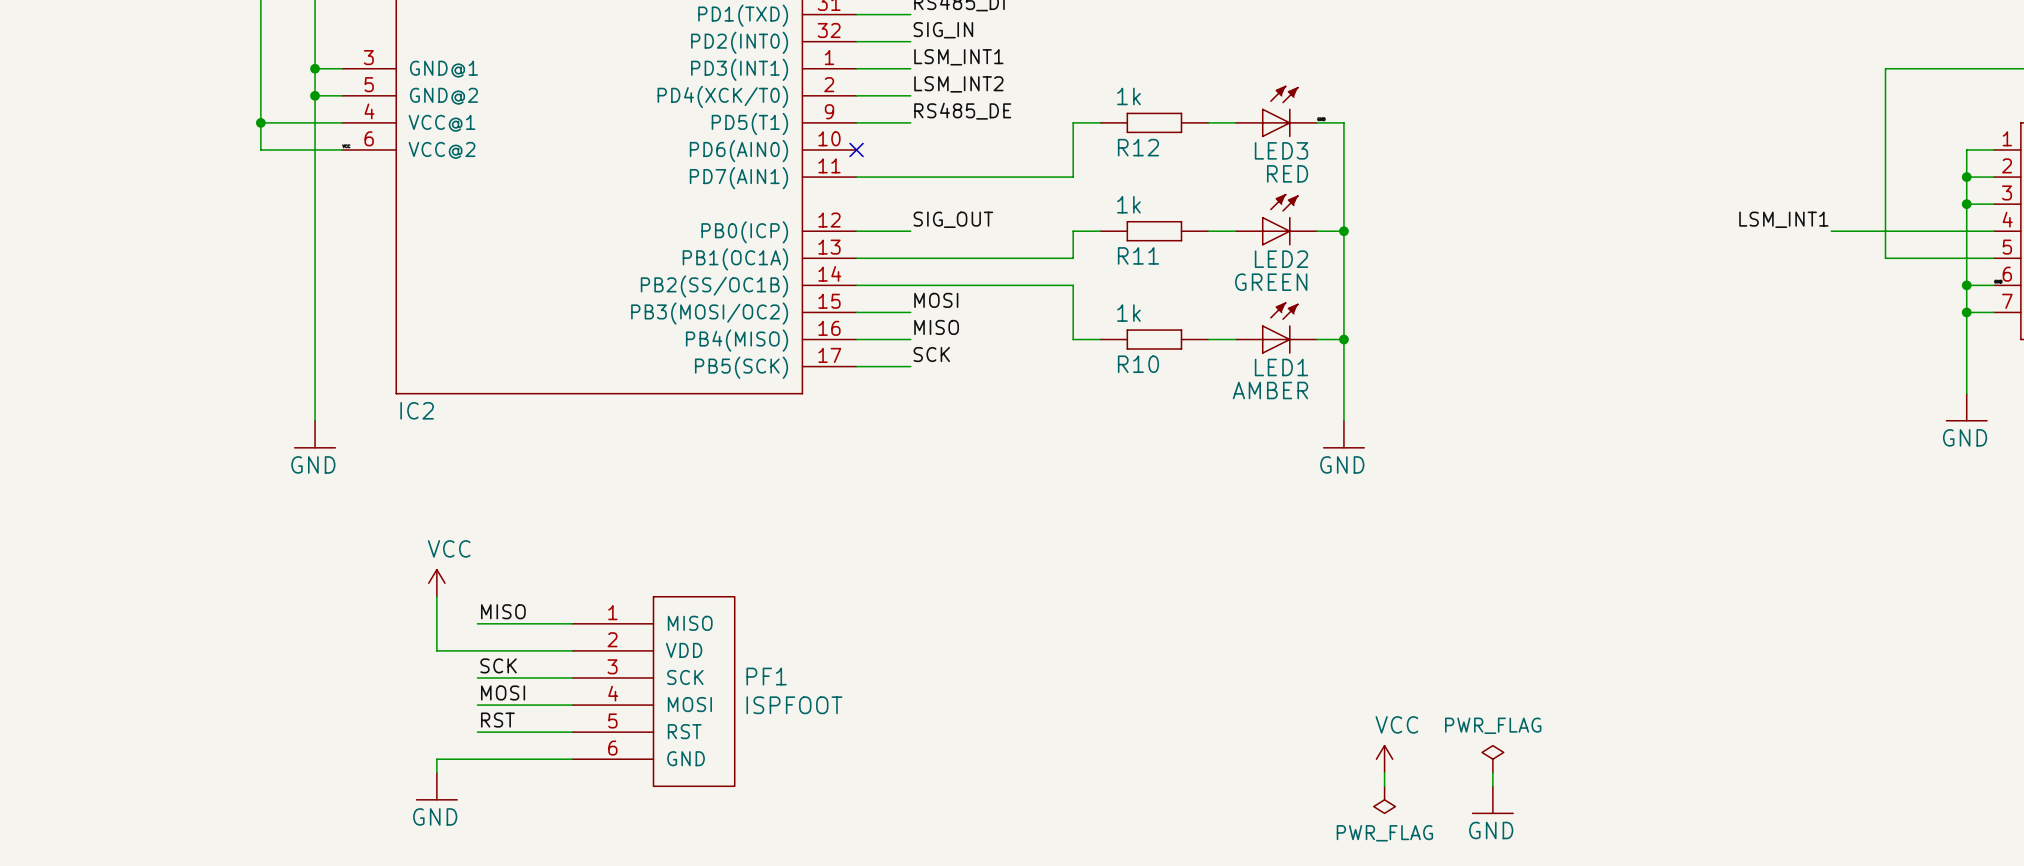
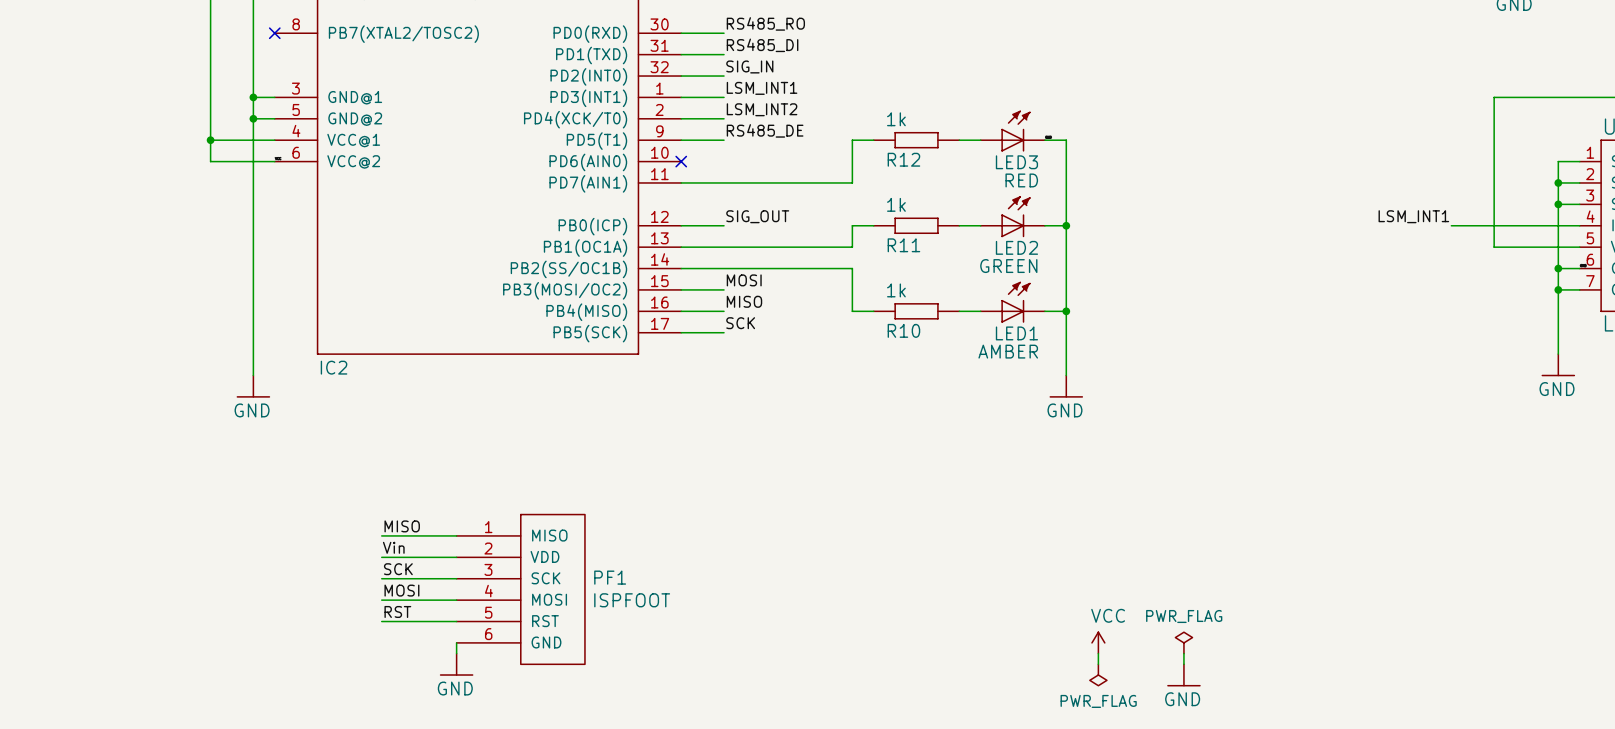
power symbol: VCC (436, 583) -> none
wire: (436, 596) (436, 650) (477, 650) -> none
label: none -> Vin (393, 547)
wire: (572, 759) (436, 759) (436, 772) -> (456, 642) (456, 653)
power symbol position: GND (436, 786) -> GND (456, 664)

